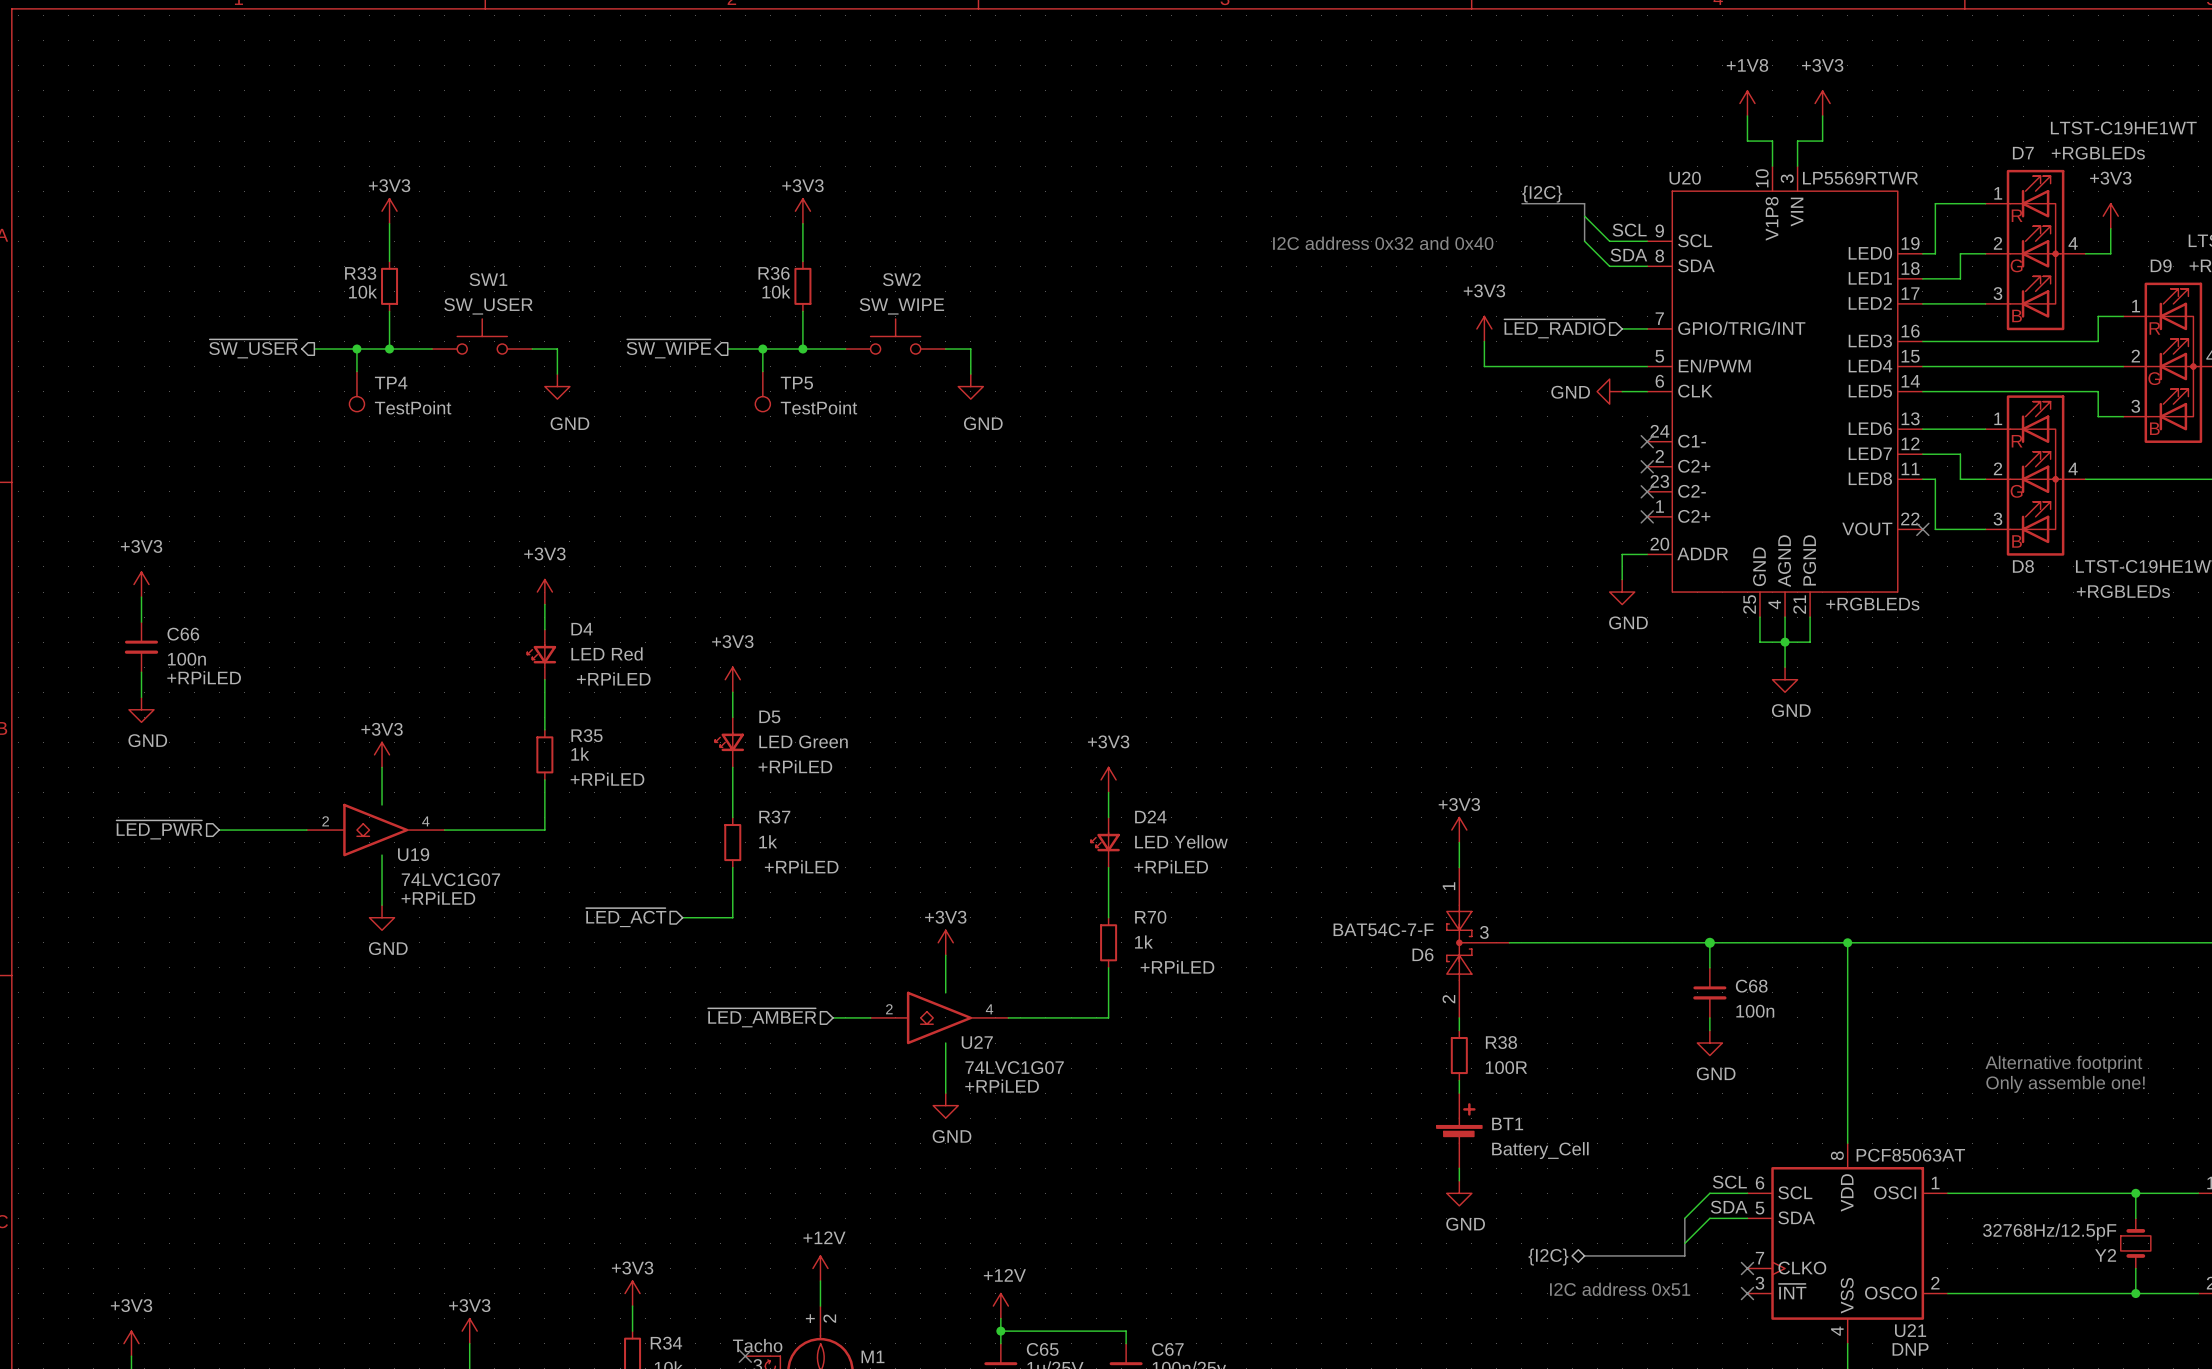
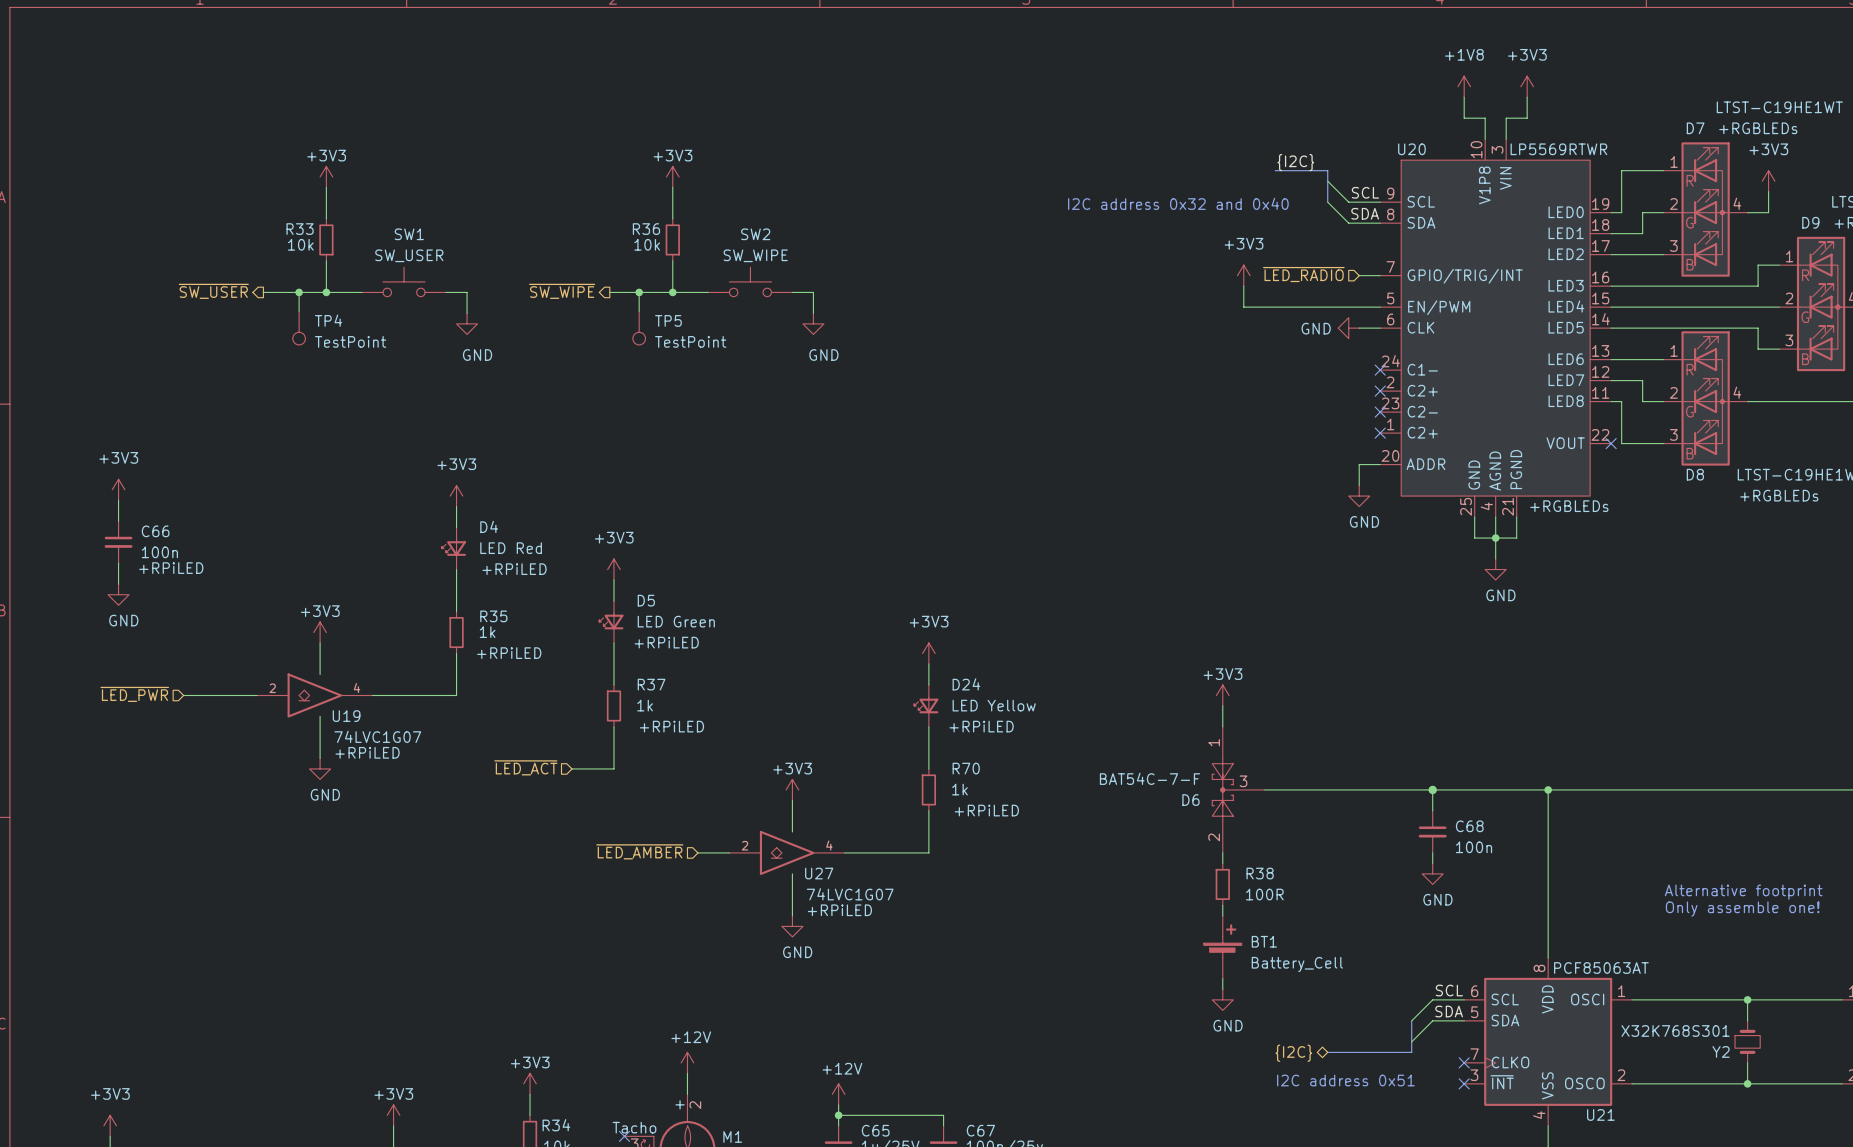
wire: (2135, 1193) (2135, 1218) -> (1747, 999) (1747, 1020)
junction position: (2135, 1193) -> (1747, 999)
Y2 value: 32768Hz/12.5pF (2049, 1231) -> X32K768S301 (1675, 1030)
Y2 position: (2135, 1243) -> (1747, 1041)
wire: (2135, 1268) (2135, 1293) -> (1747, 1062) (1747, 1083)
junction position: (2135, 1293) -> (1747, 1083)
U21 text: DNP (1910, 1349) -> none

